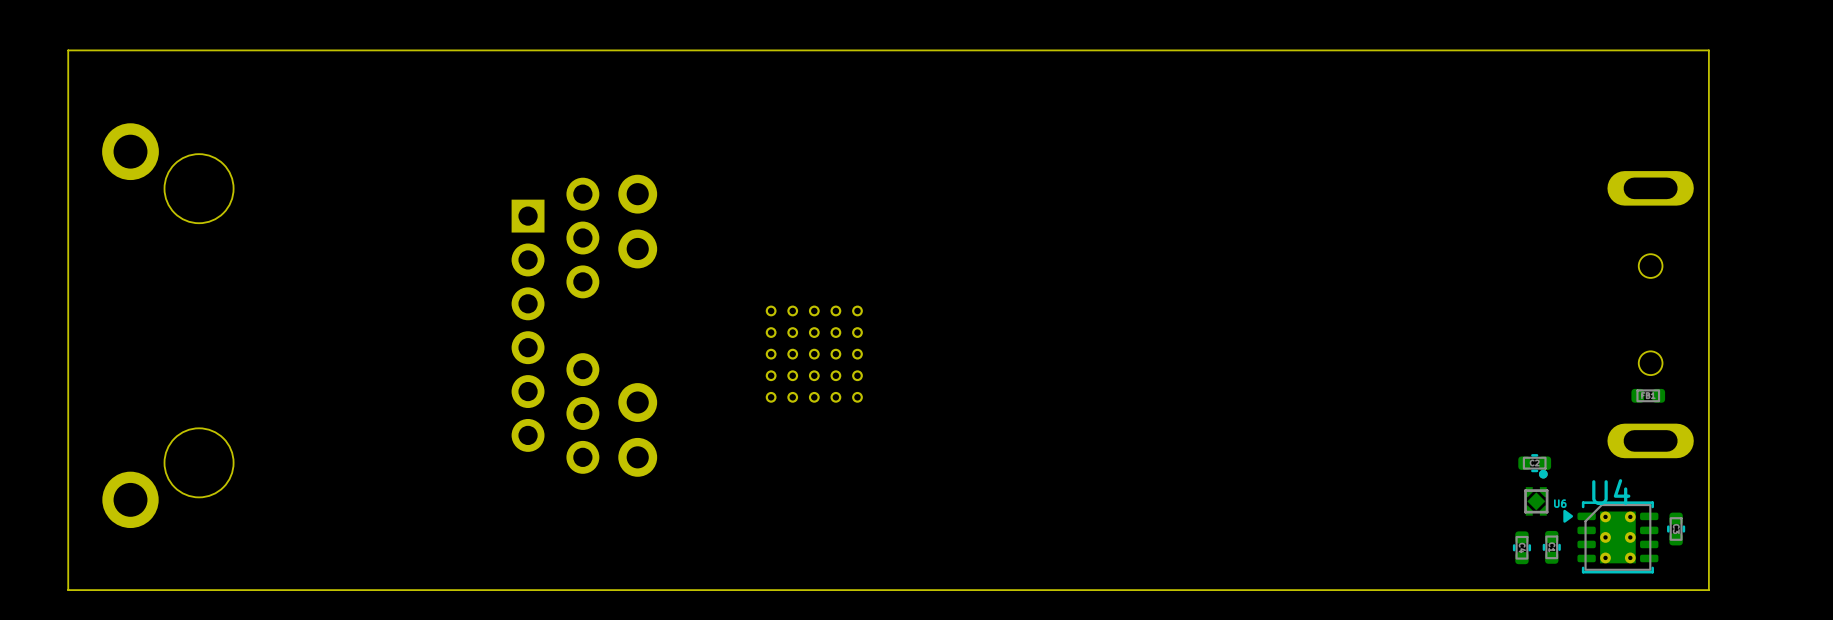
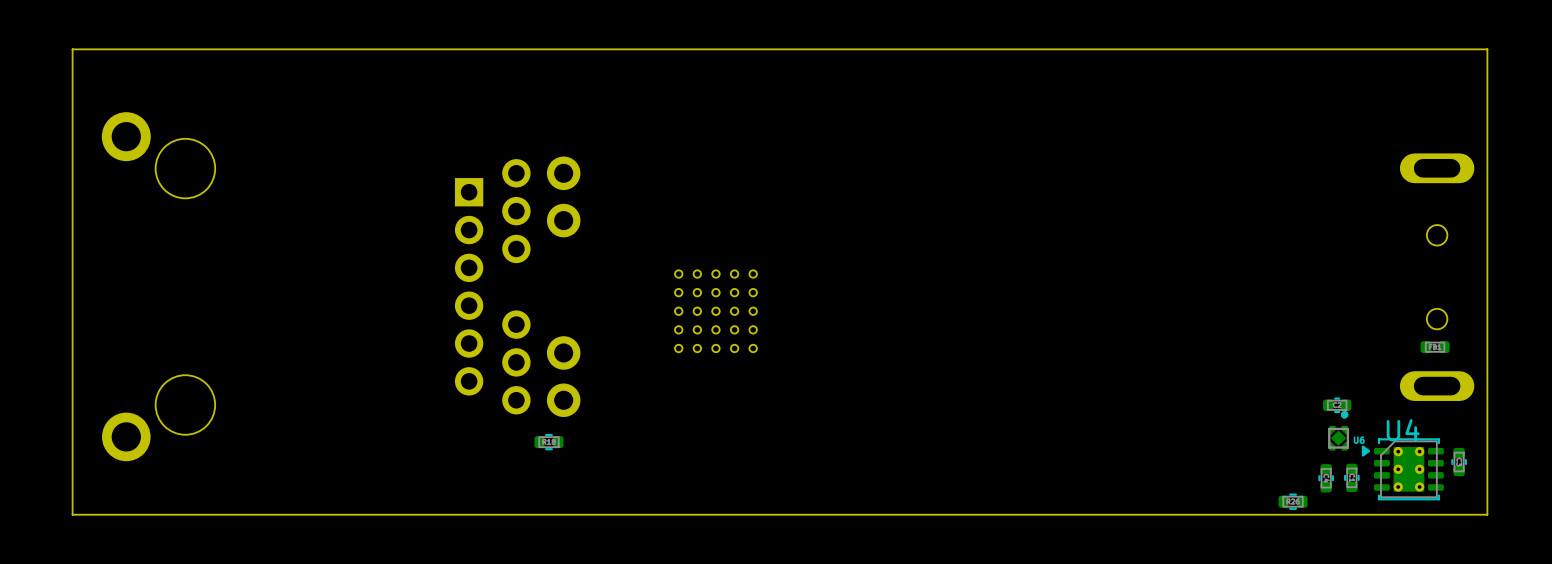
part: none -> (548, 442)
part: none -> (1293, 501)

